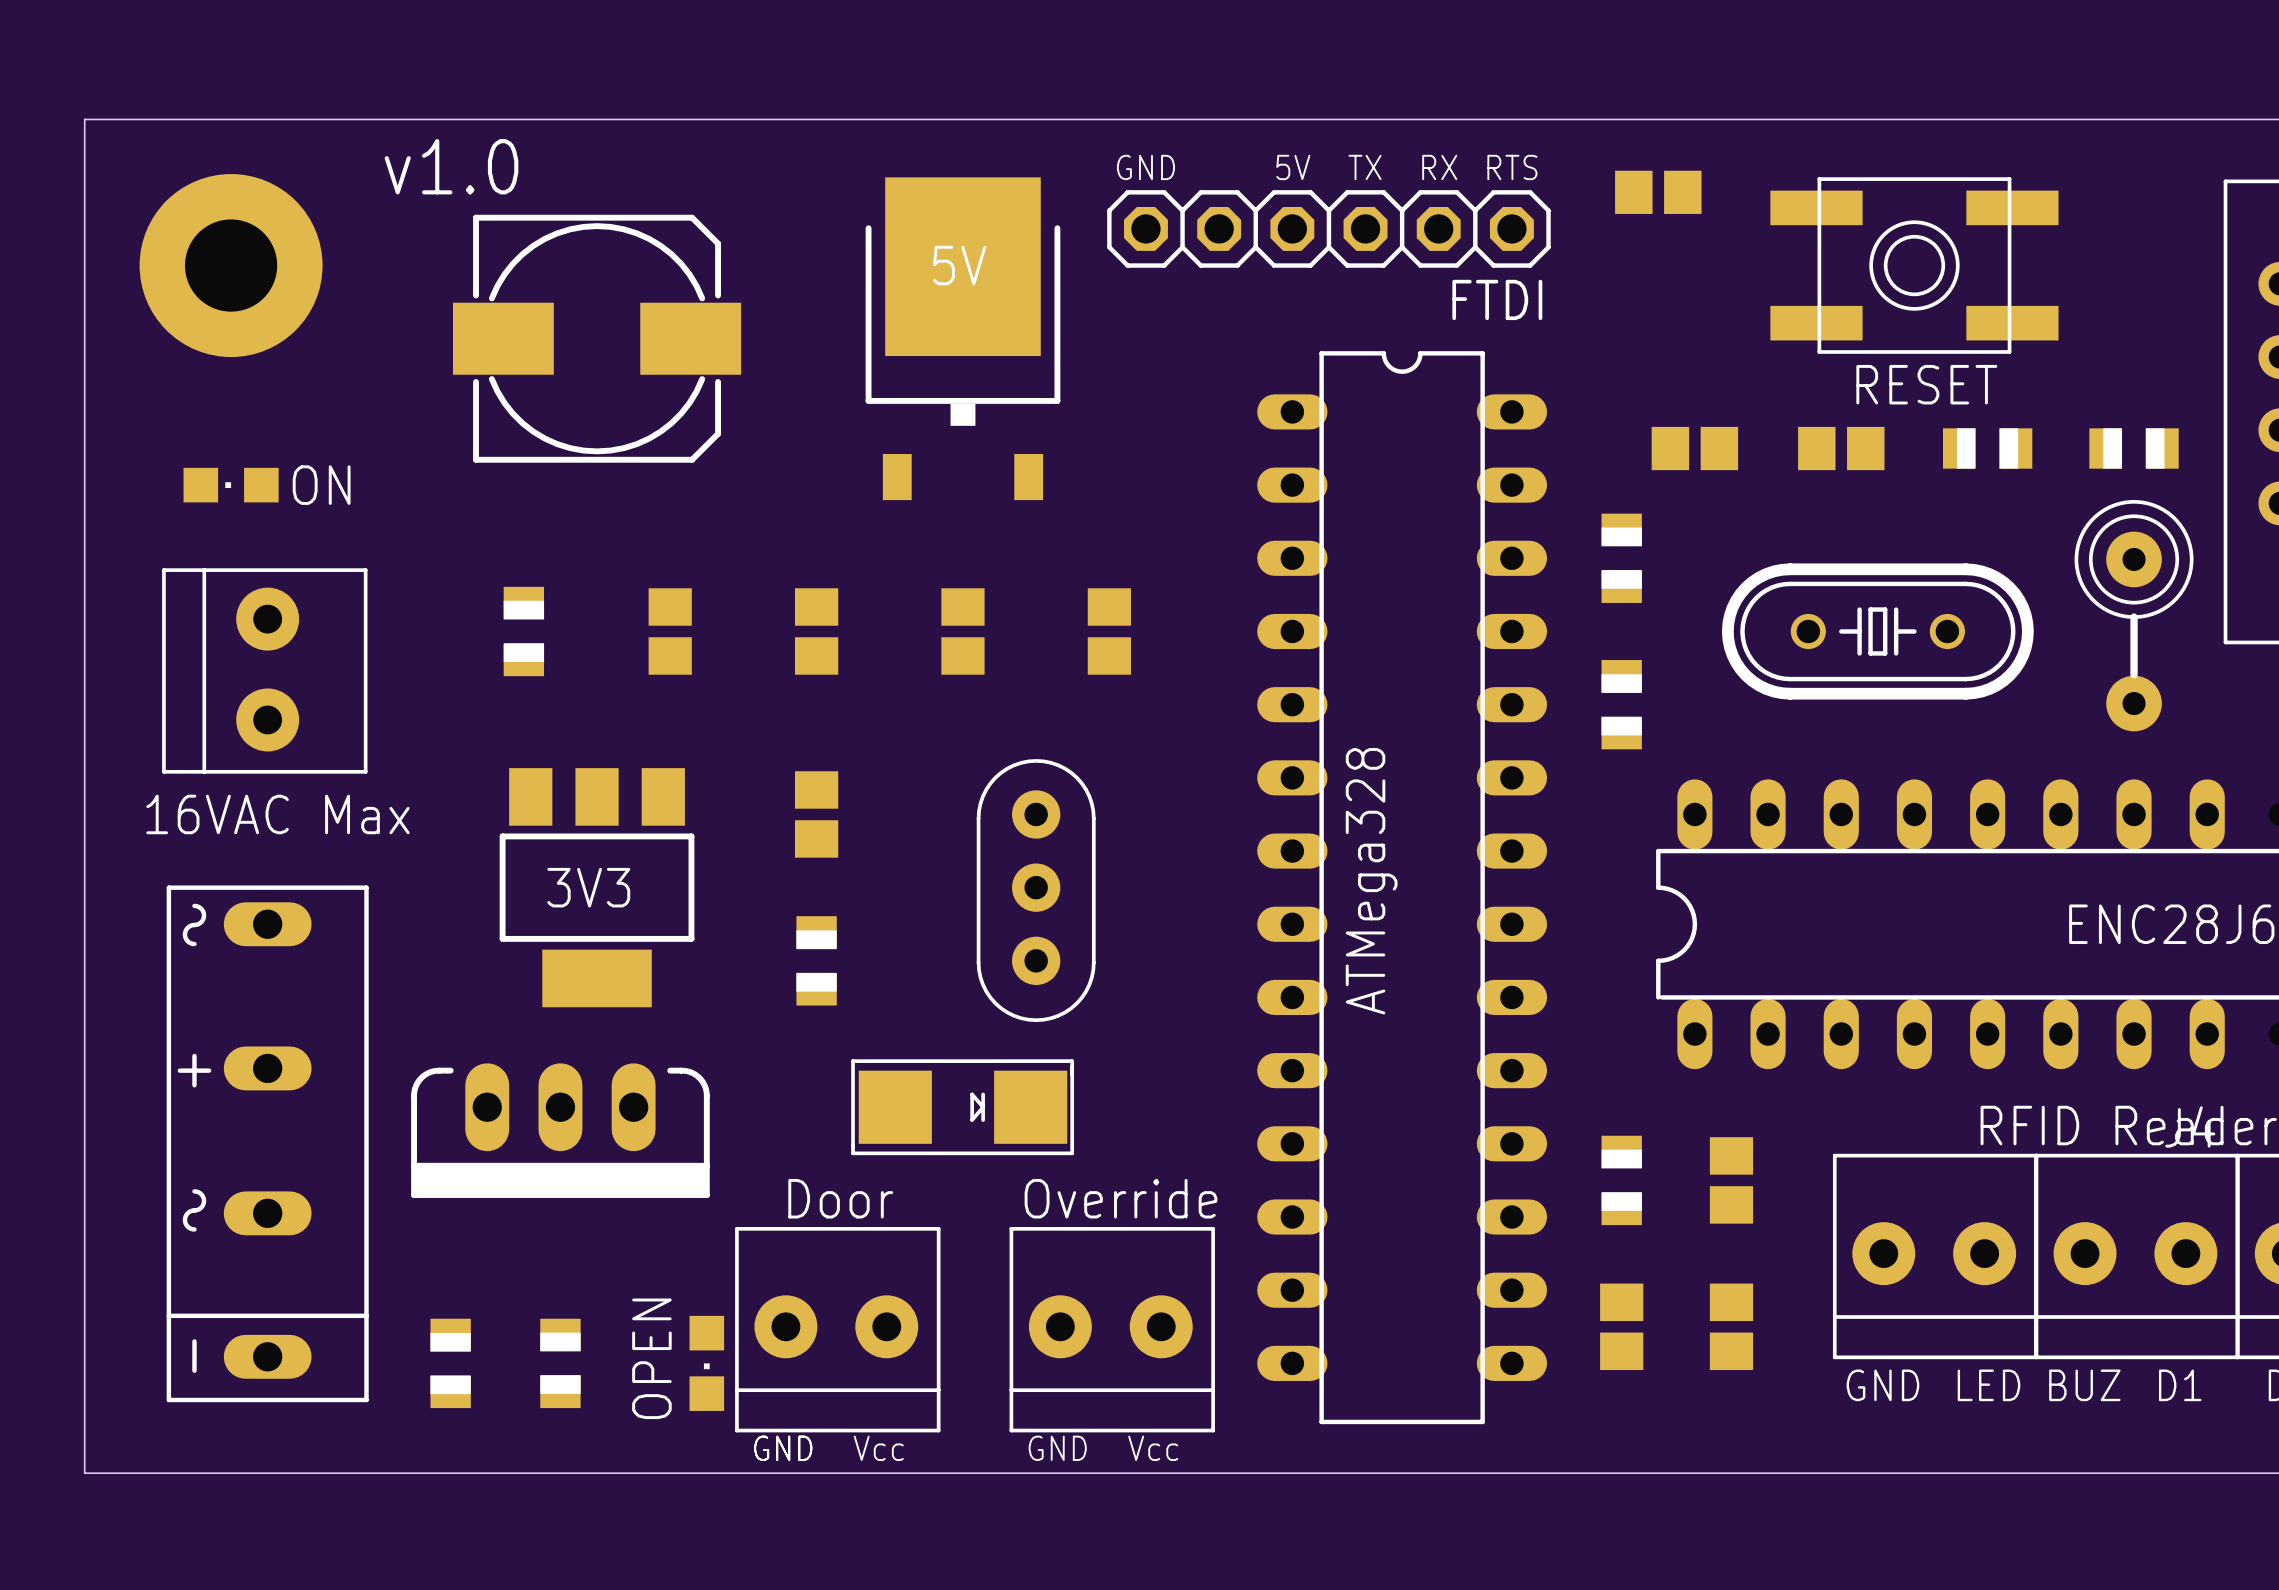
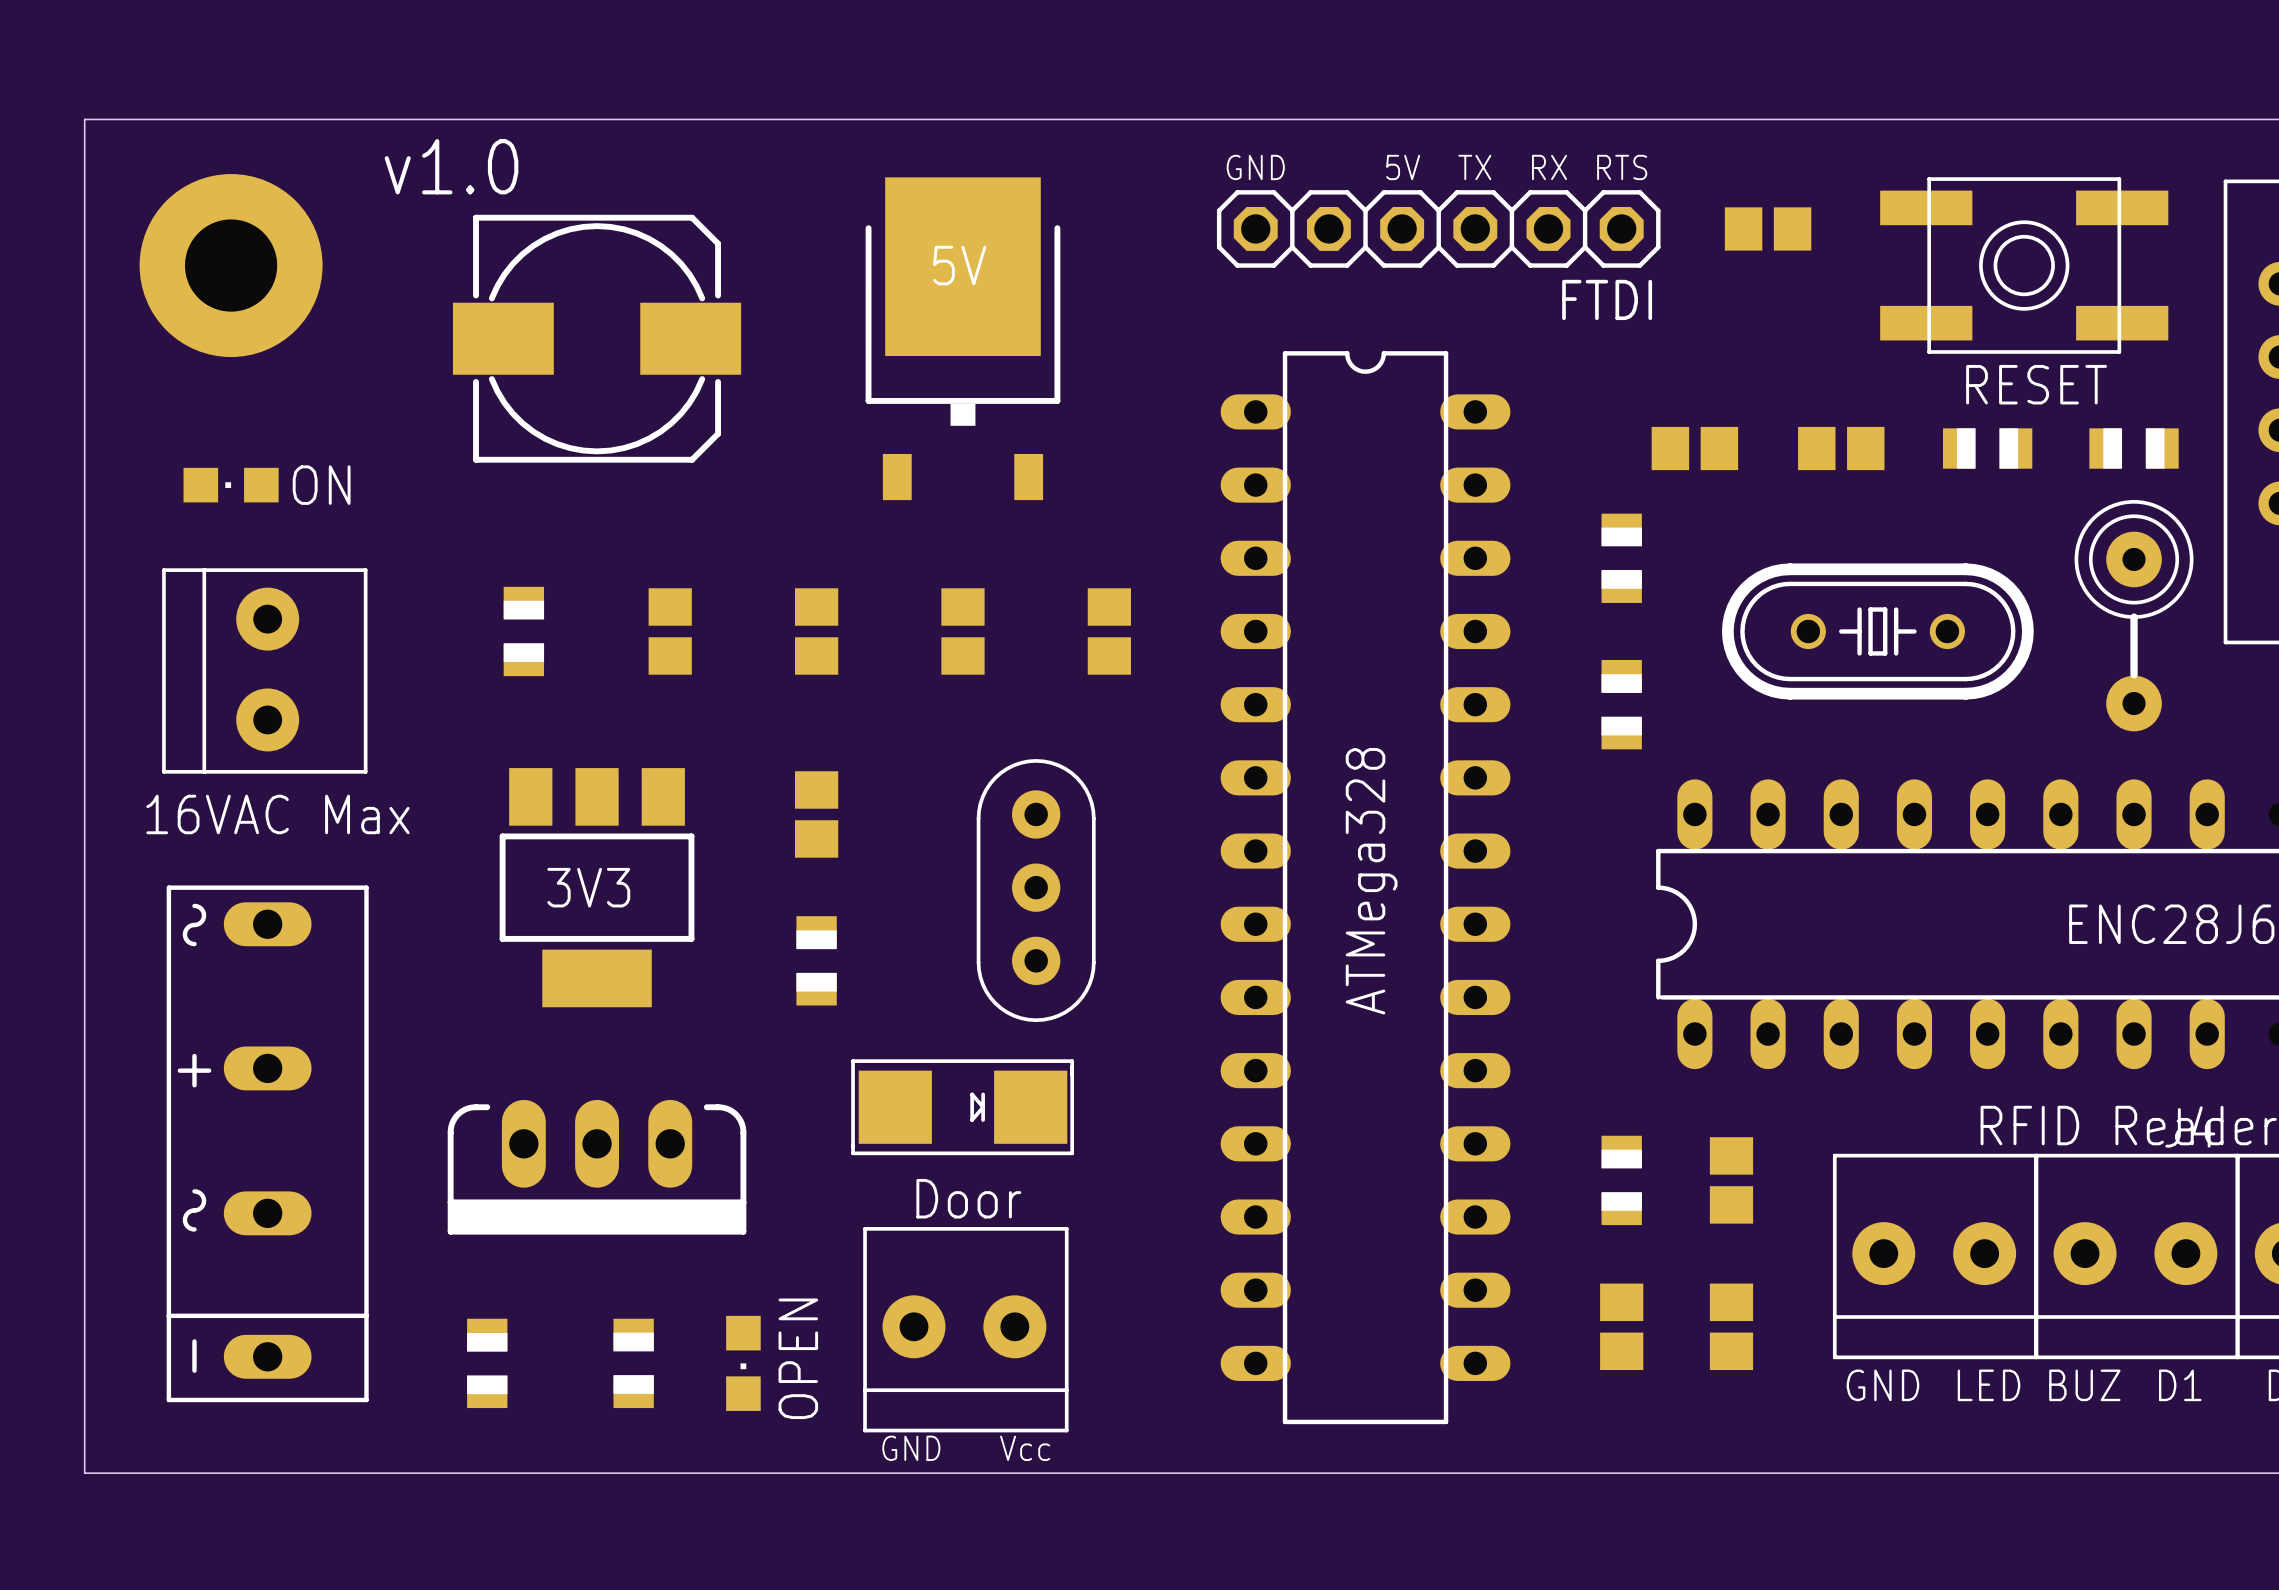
text position: GND (1145, 167) -> GND (1255, 167)
text position: 5V (1293, 167) -> 5V (1403, 167)
text position: TX (1365, 167) -> TX (1474, 167)
text position: RX (1439, 167) -> RX (1549, 167)
text position: RTS (1512, 167) -> RTS (1622, 167)
part position: (1658, 192) -> (1768, 228)
FTDI position: (1328, 228) -> (1438, 228)
RESET position: (1914, 265) -> (2024, 265)
part position: (1402, 887) -> (1365, 887)
part position: (560, 1130) -> (597, 1167)
text position: Door (840, 1198) -> Door (968, 1198)
text: Override (1120, 1198) -> none
part: (837, 1329) -> none
part: none -> (965, 1329)
part: (1112, 1329) -> none
text position: OPEN (651, 1358) -> OPEN (798, 1358)
part: (450, 1363) -> none
part: none -> (487, 1363)
part: (560, 1363) -> none
part: none -> (633, 1363)
part position: (706, 1363) -> (743, 1363)
text: GND (783, 1448) -> none
text: Vcc (878, 1448) -> none
text: none -> GND (911, 1448)
text: none -> Vcc (1025, 1448)
text: GND (1057, 1448) -> none
text: Vcc (1153, 1448) -> none

